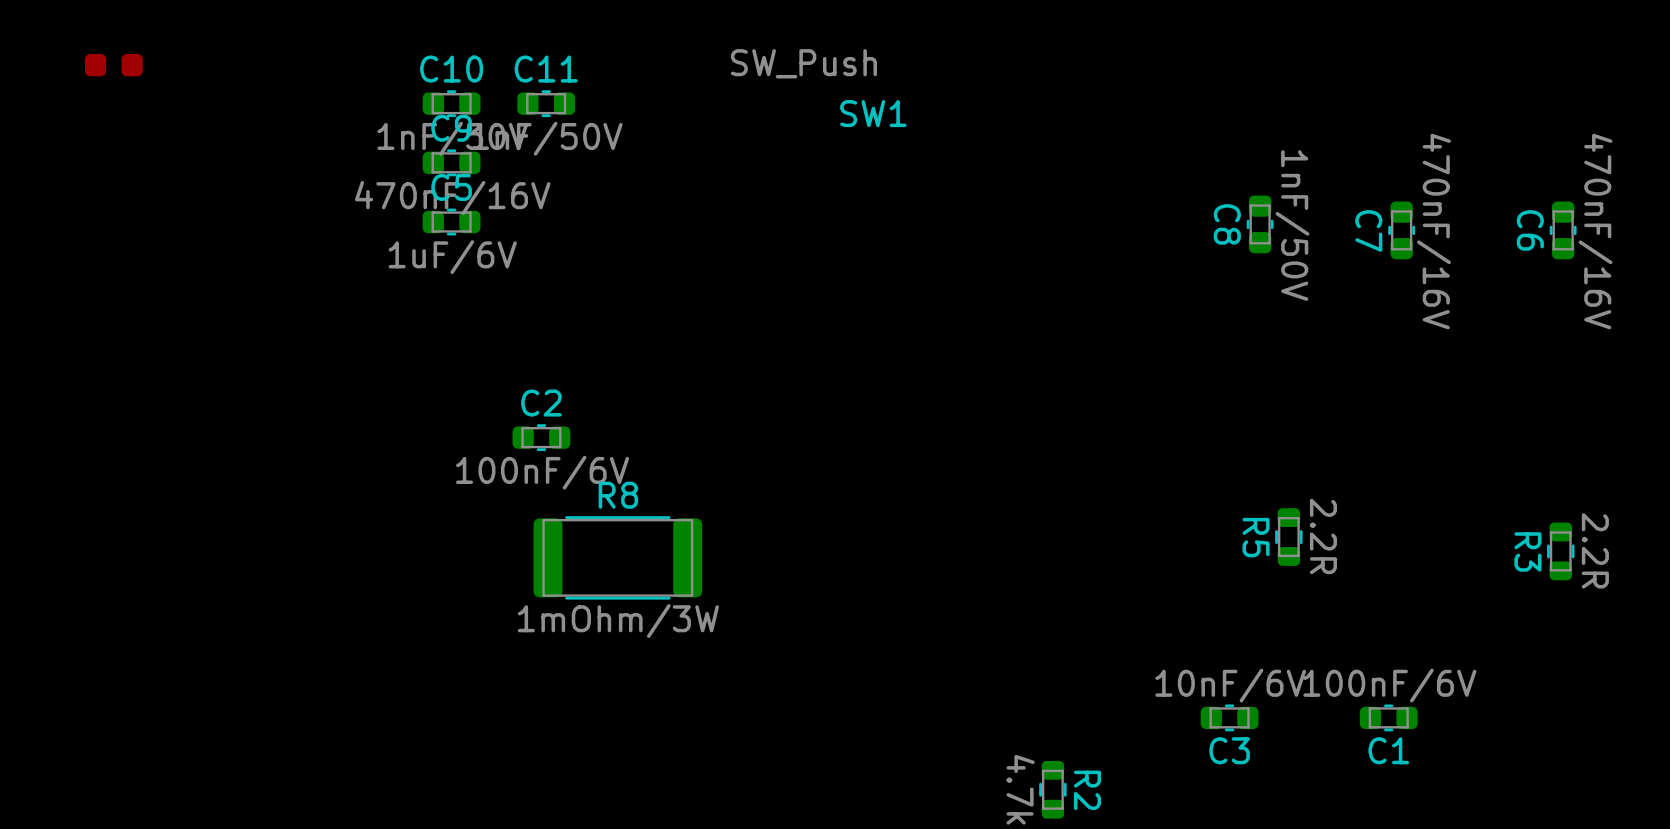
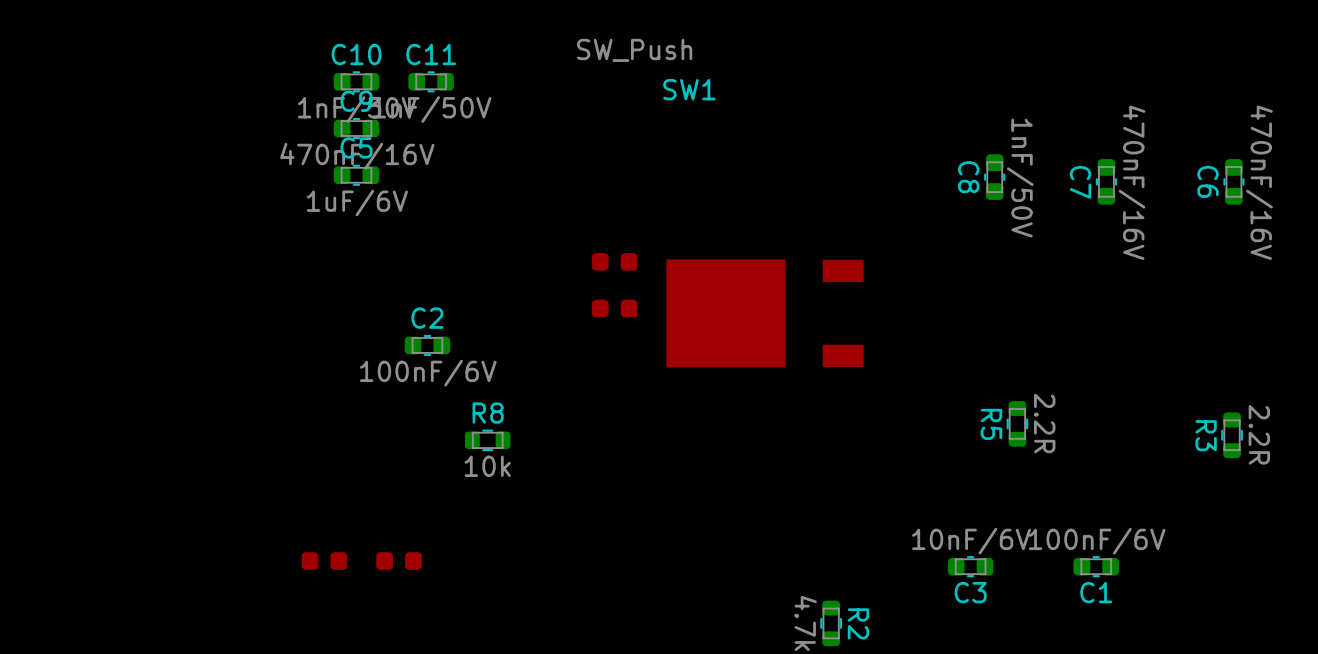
part: (113, 65) -> none
part: none -> (614, 261)
part: none -> (614, 308)
part: none -> (765, 313)
R8 footprint: [533, 516, 703, 600] -> [464, 429, 511, 452]
R8 value: 1mOhm/3W (618, 621) -> 10k (487, 466)
part: none -> (324, 561)
part: none -> (399, 561)

